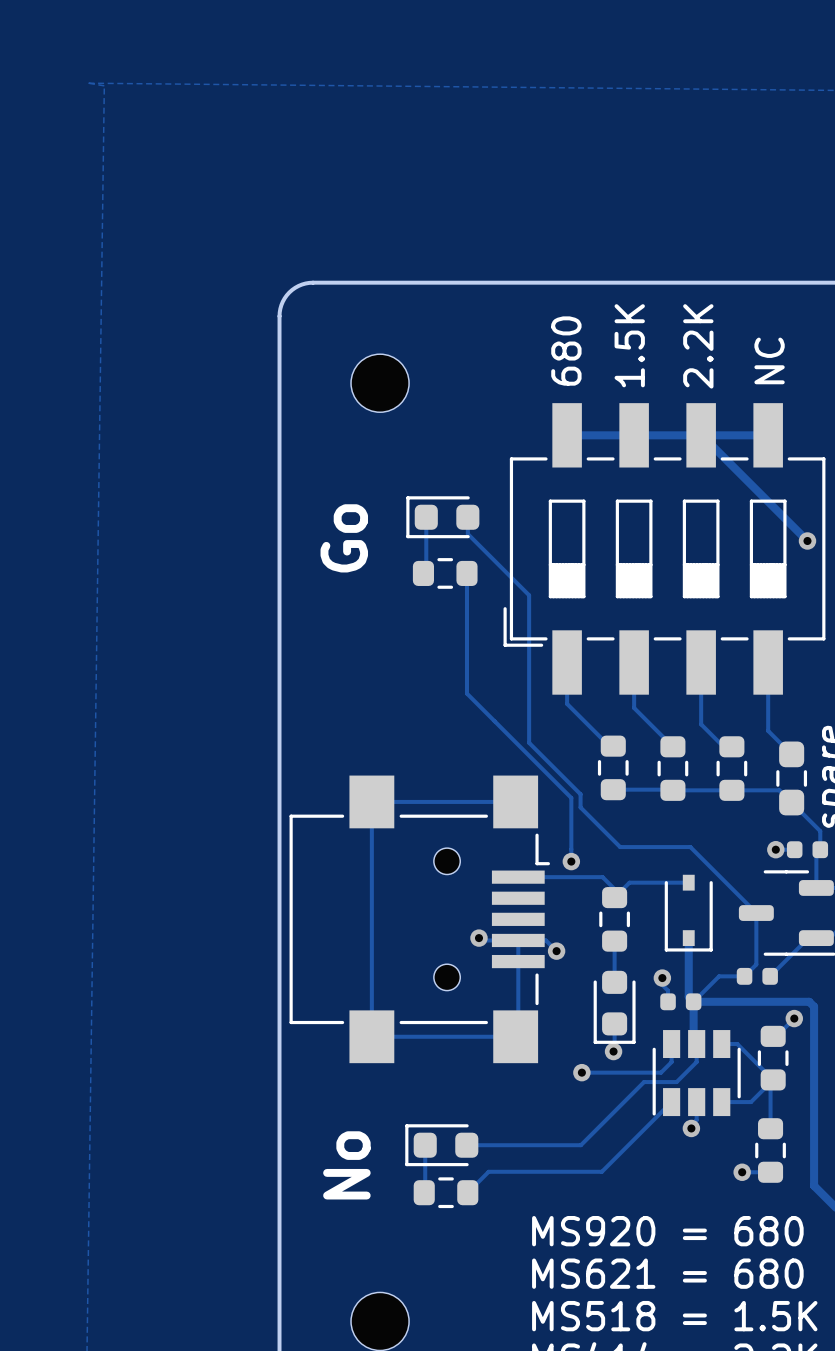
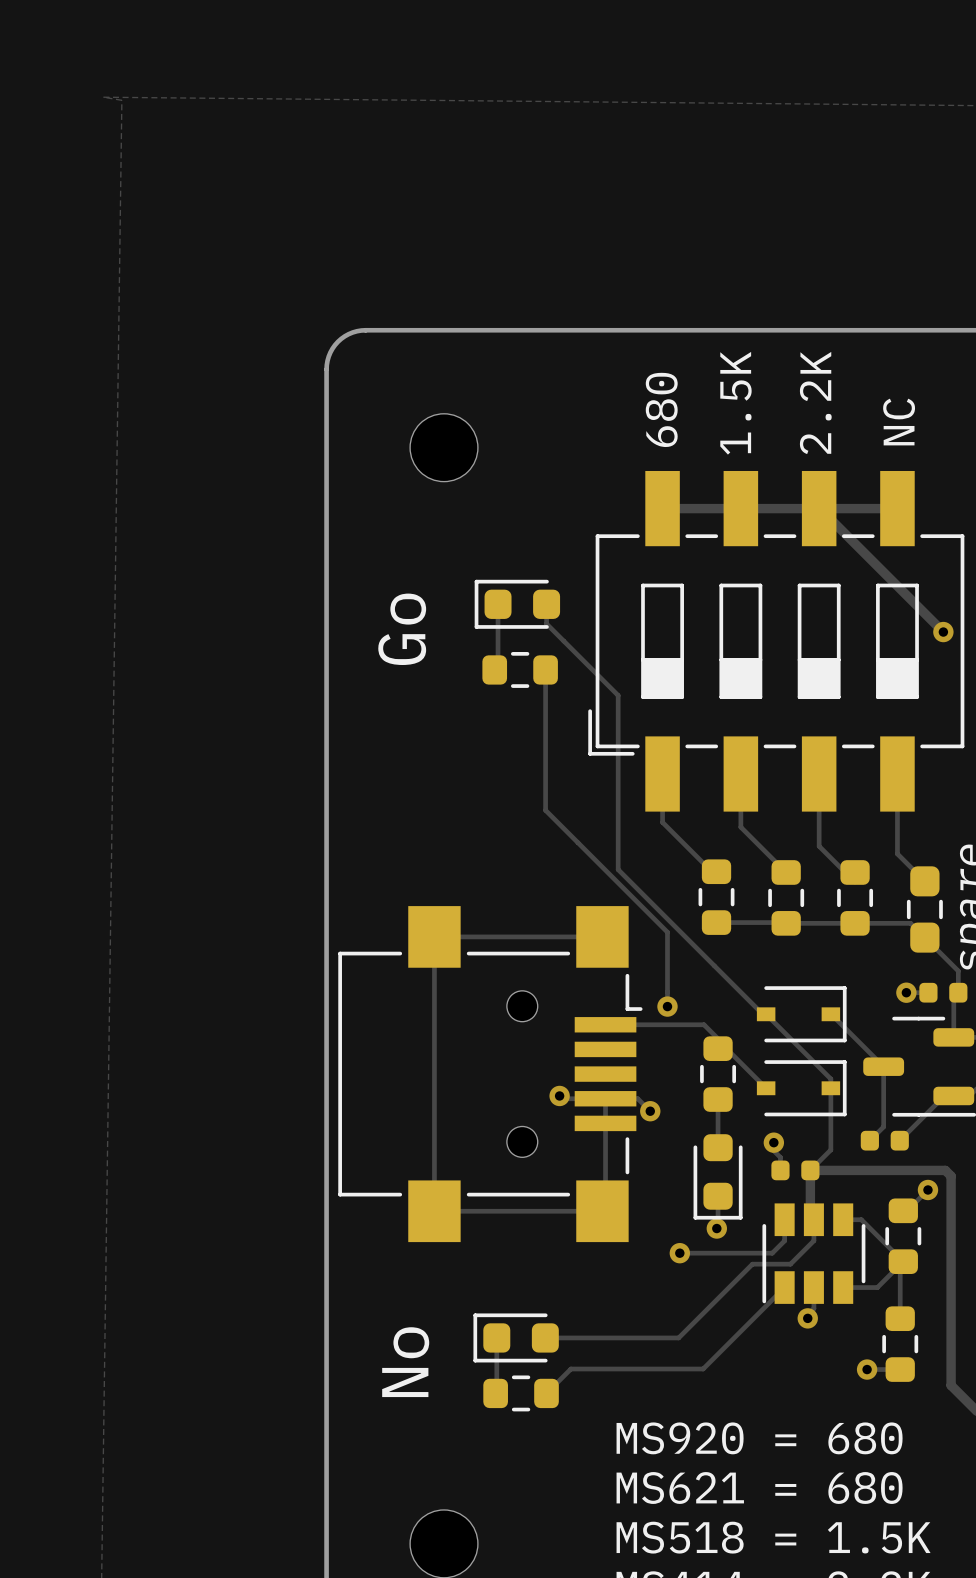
track: (529, 742) (580, 794) (580, 807) (620, 847) (690, 847) (711, 868) -> (618, 867) (762, 1014) (766, 1014) (830, 1079) (830, 1149)
part: none -> (801, 1014)
track: (688, 882) (629, 882) (614, 897) -> (766, 1088) (726, 1048) (718, 1048)
part rotation: 0° (688, 913) -> 90° counterclockwise (801, 1088)
track: (688, 938) (688, 996) (693, 1001) -> none
track: (744, 976) (719, 976) (711, 984) -> none

